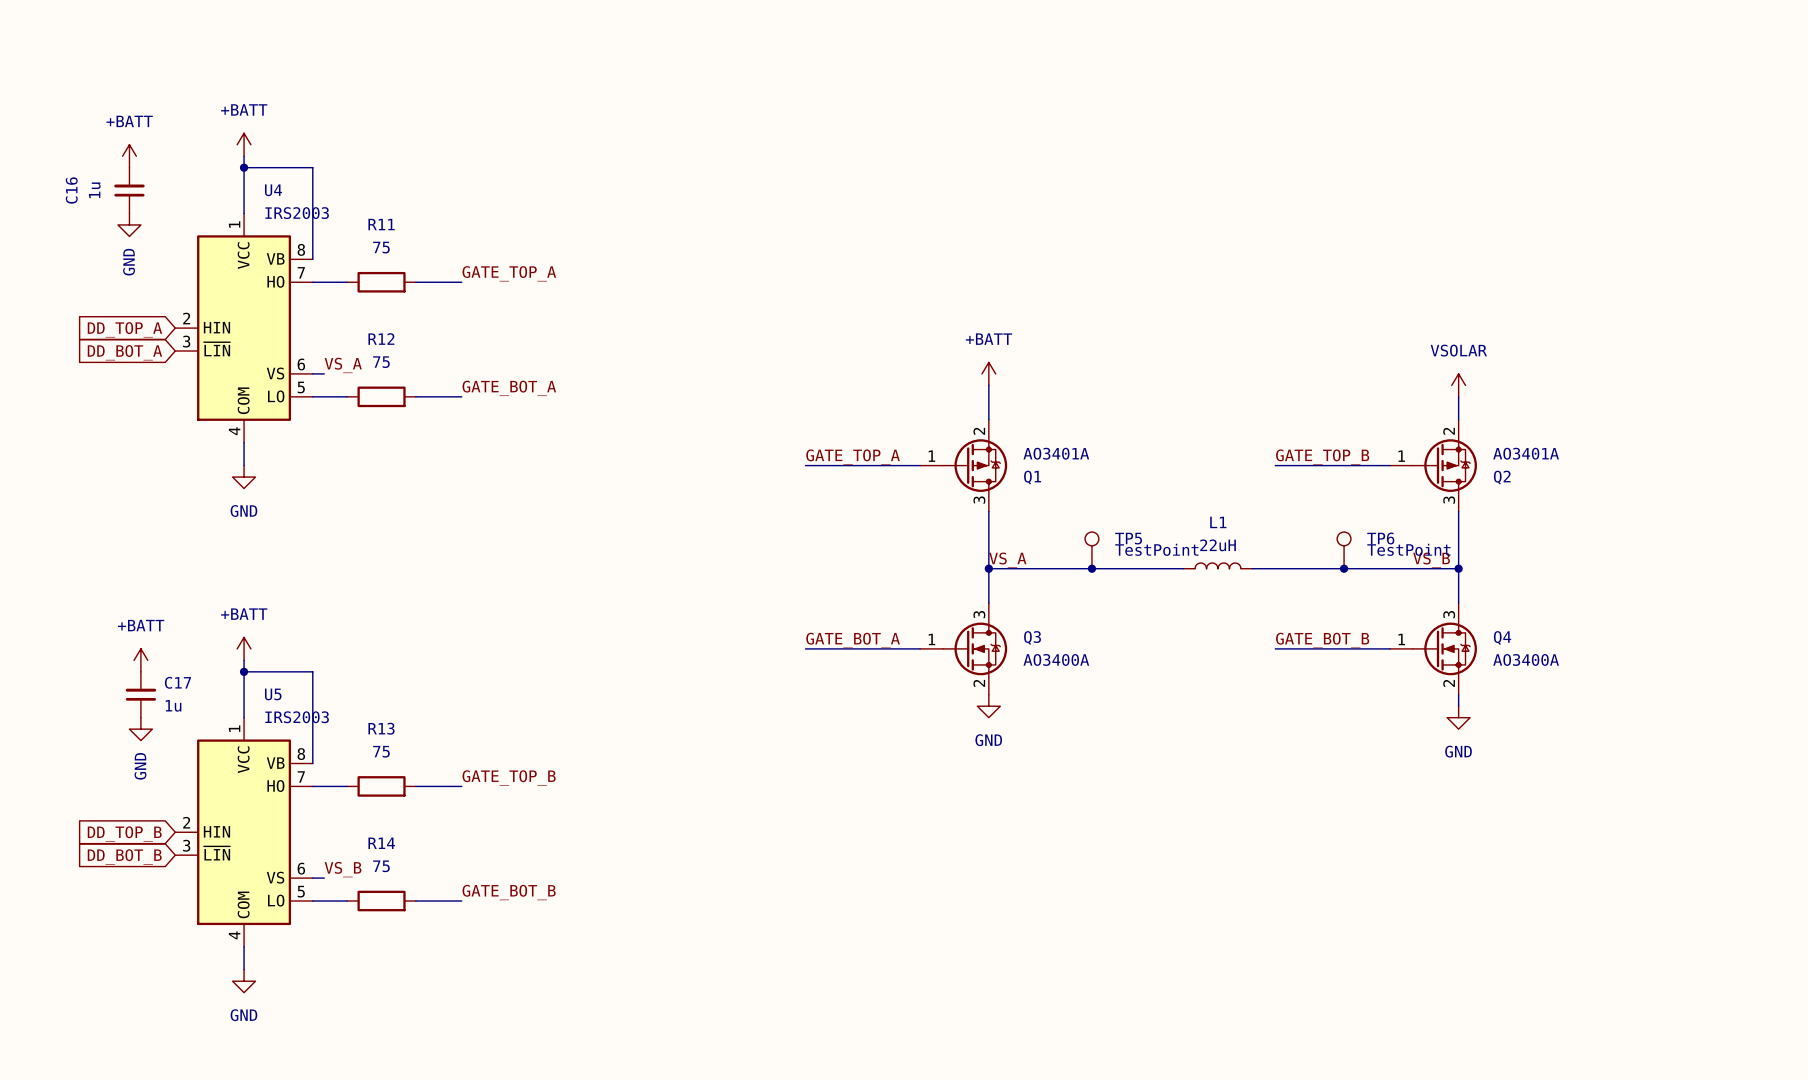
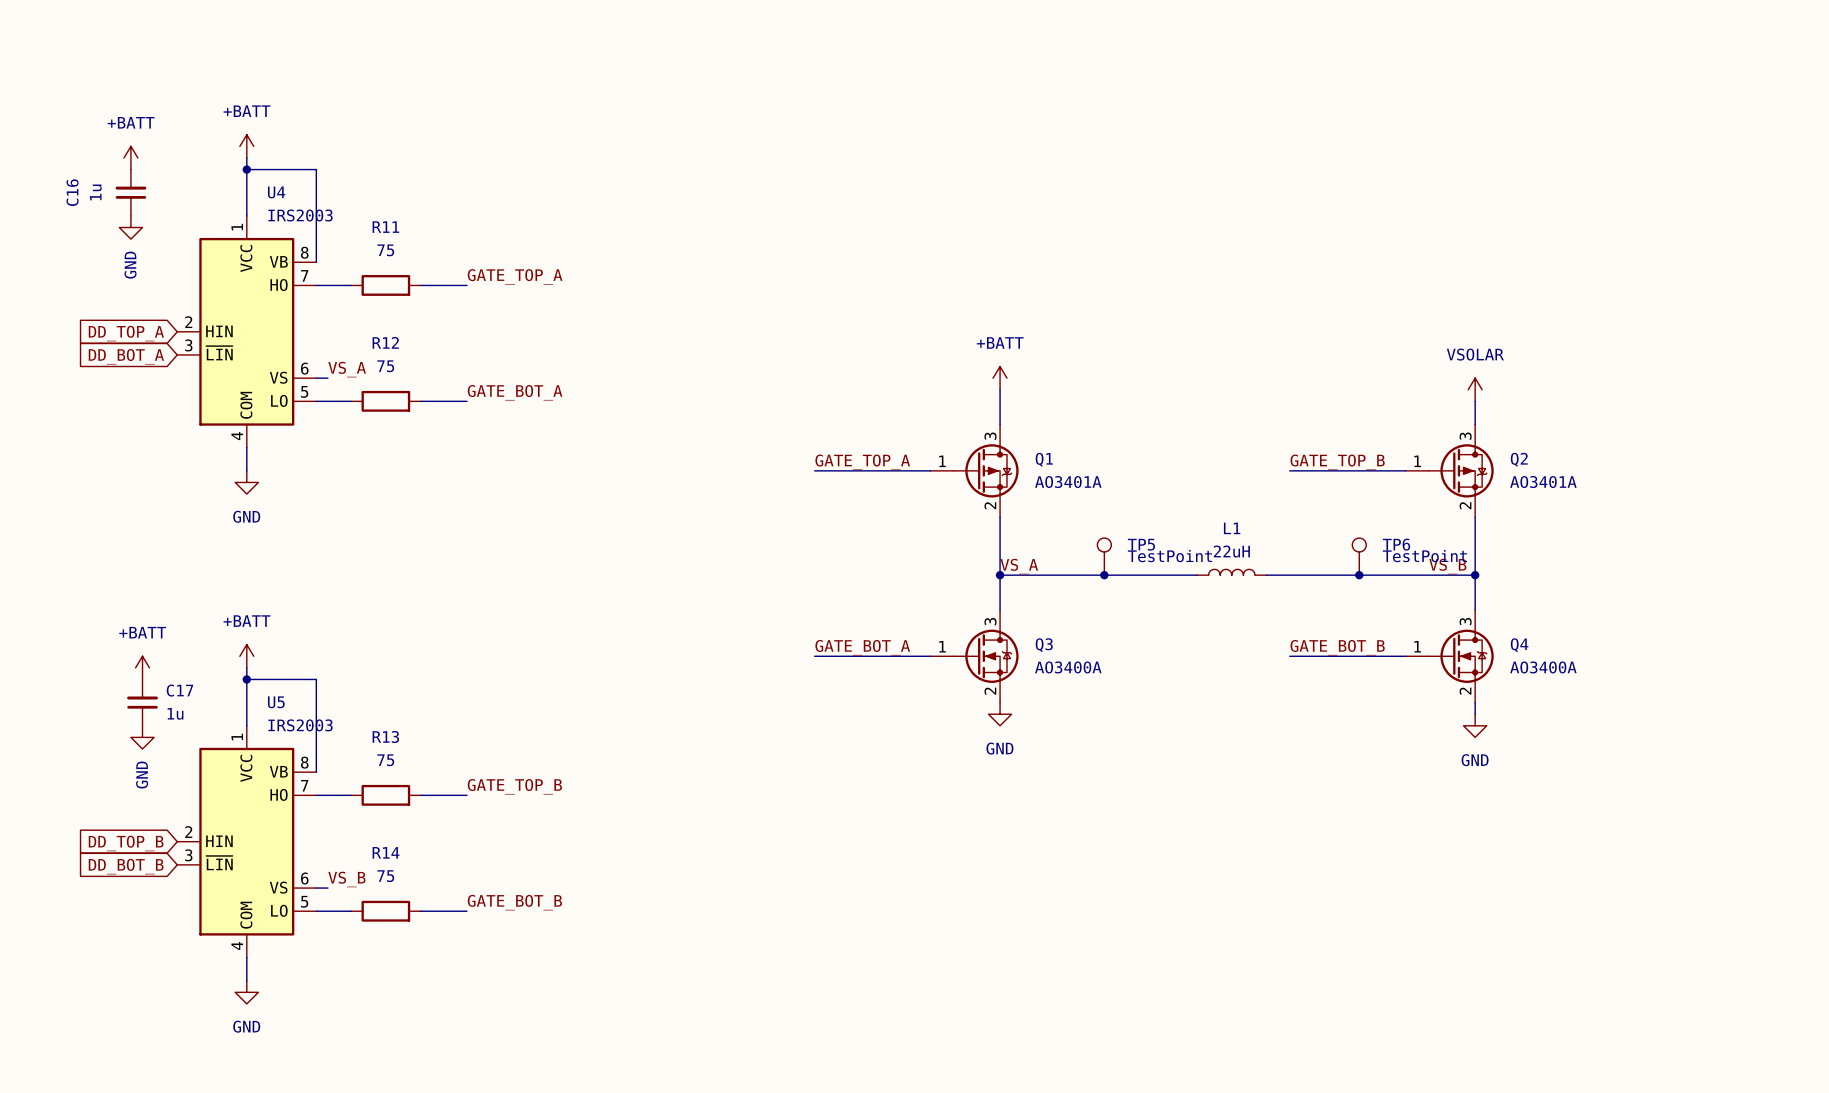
Q1 flip: as is (975, 465) -> up-down (986, 470)
Q2 flip: as is (1444, 465) -> up-down (1461, 470)

